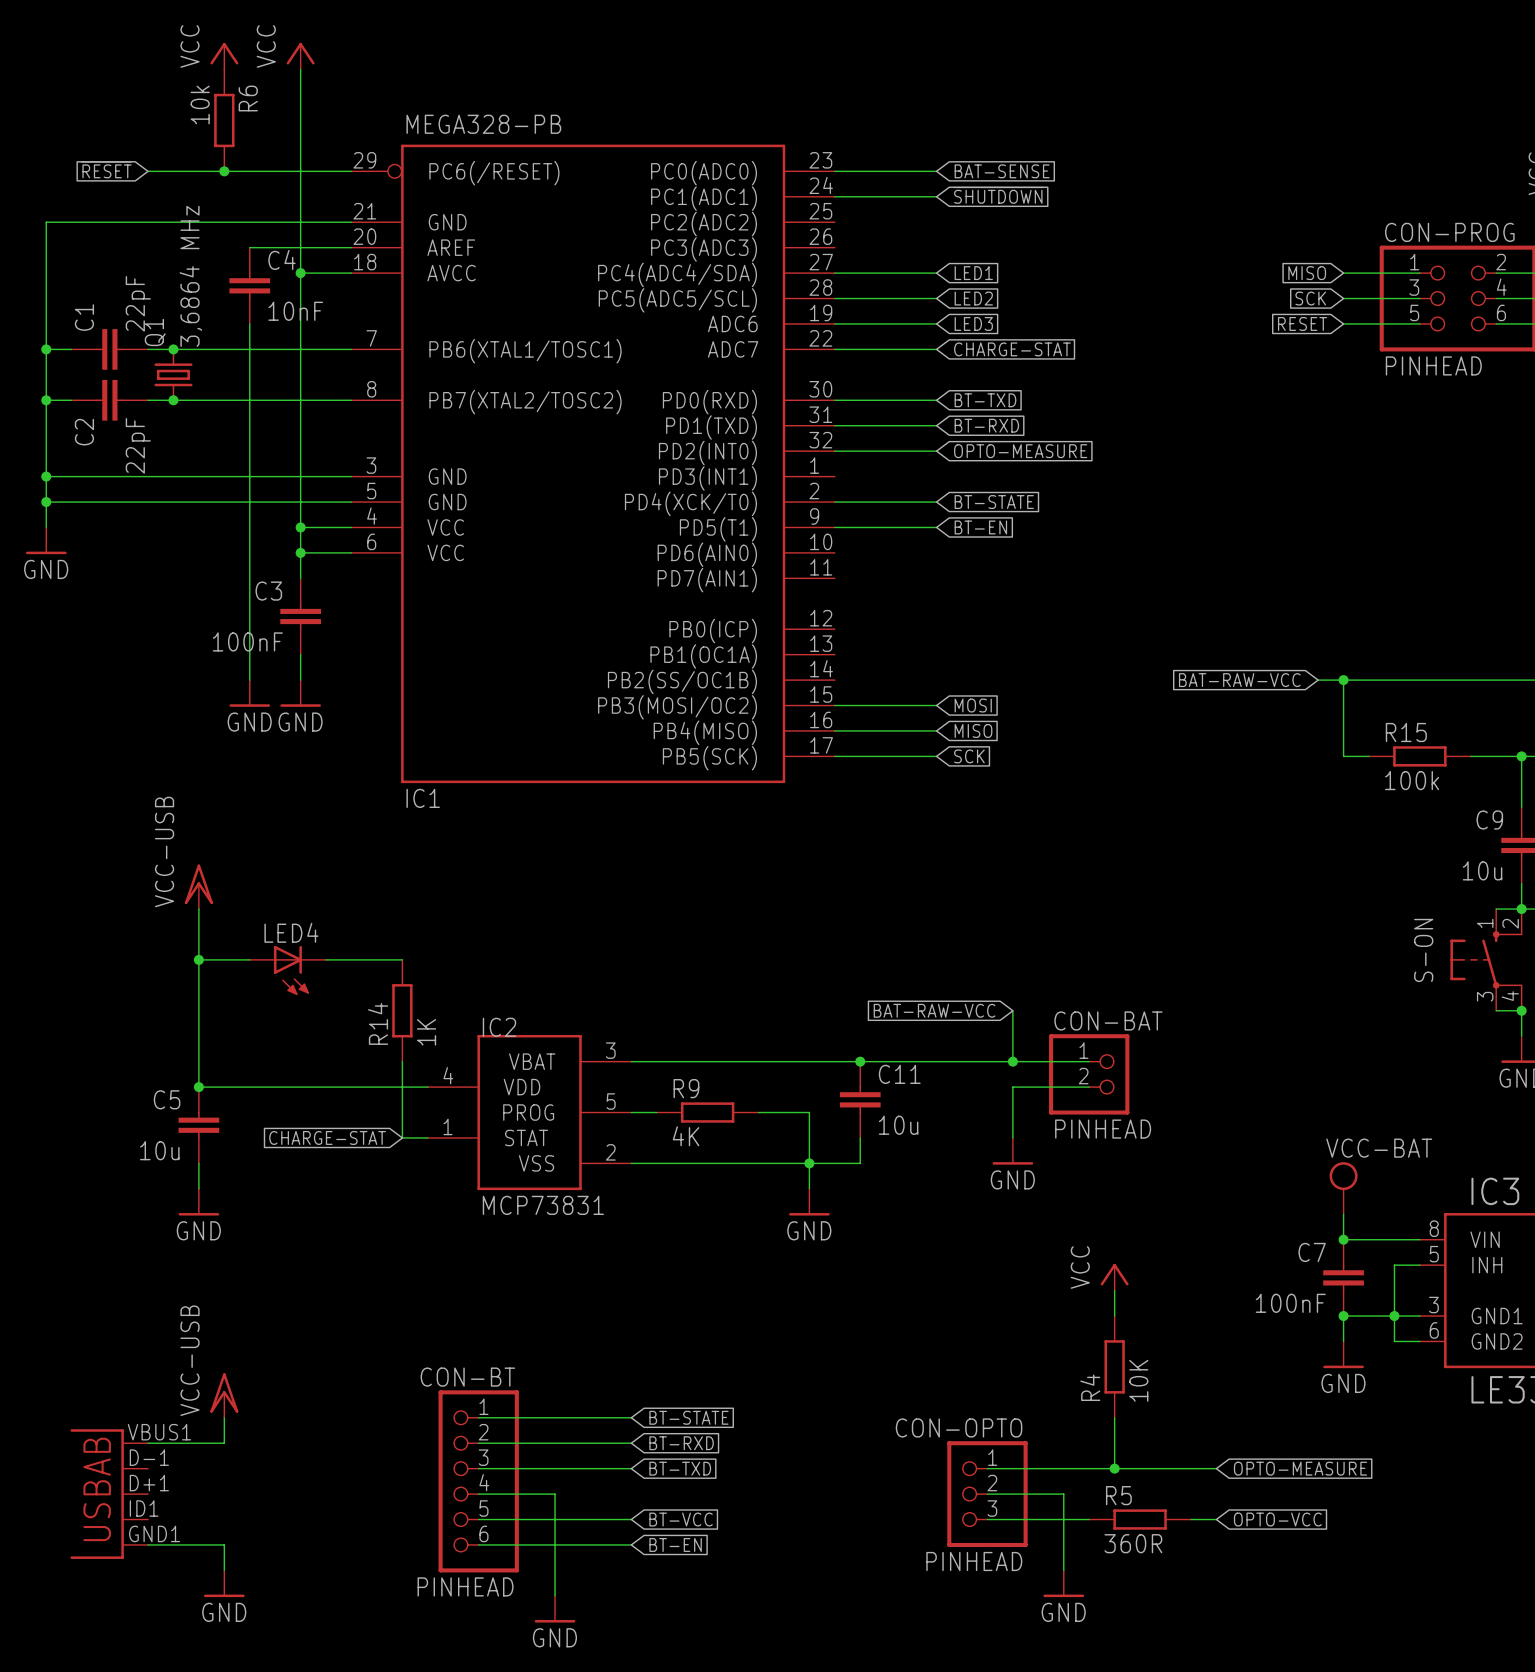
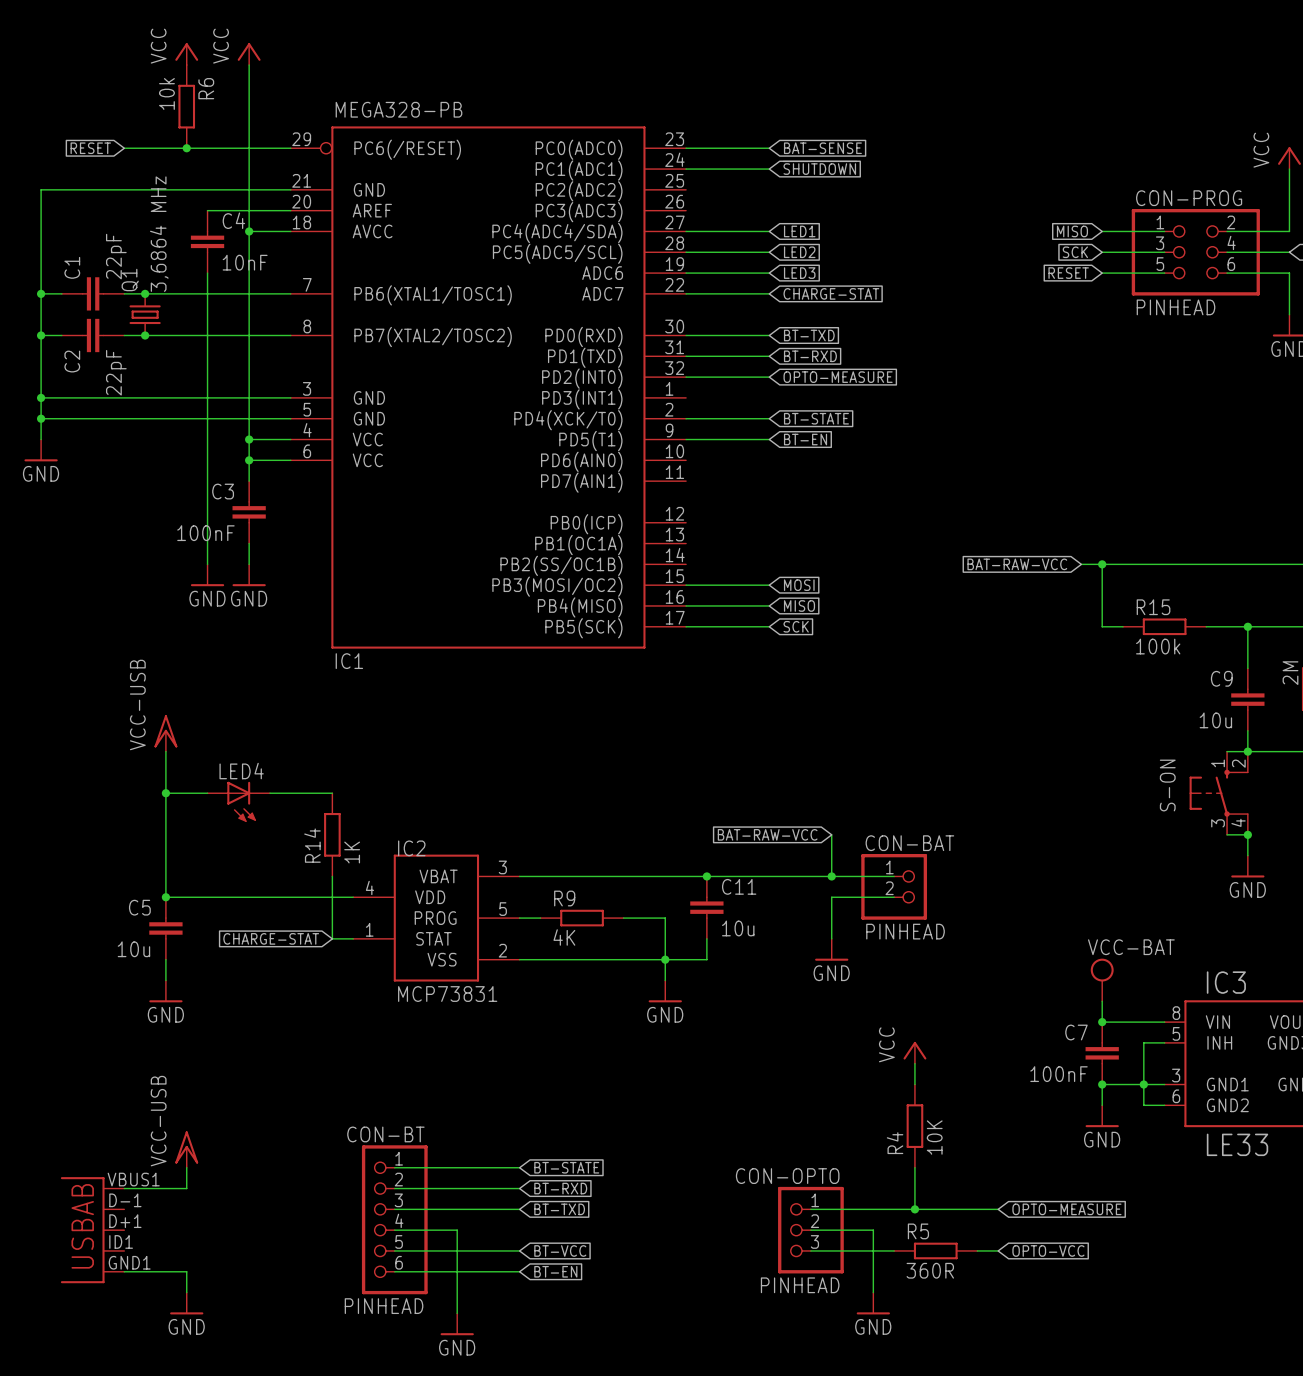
global label: ~{RESET} (106, 169) -> RESET (90, 148)

